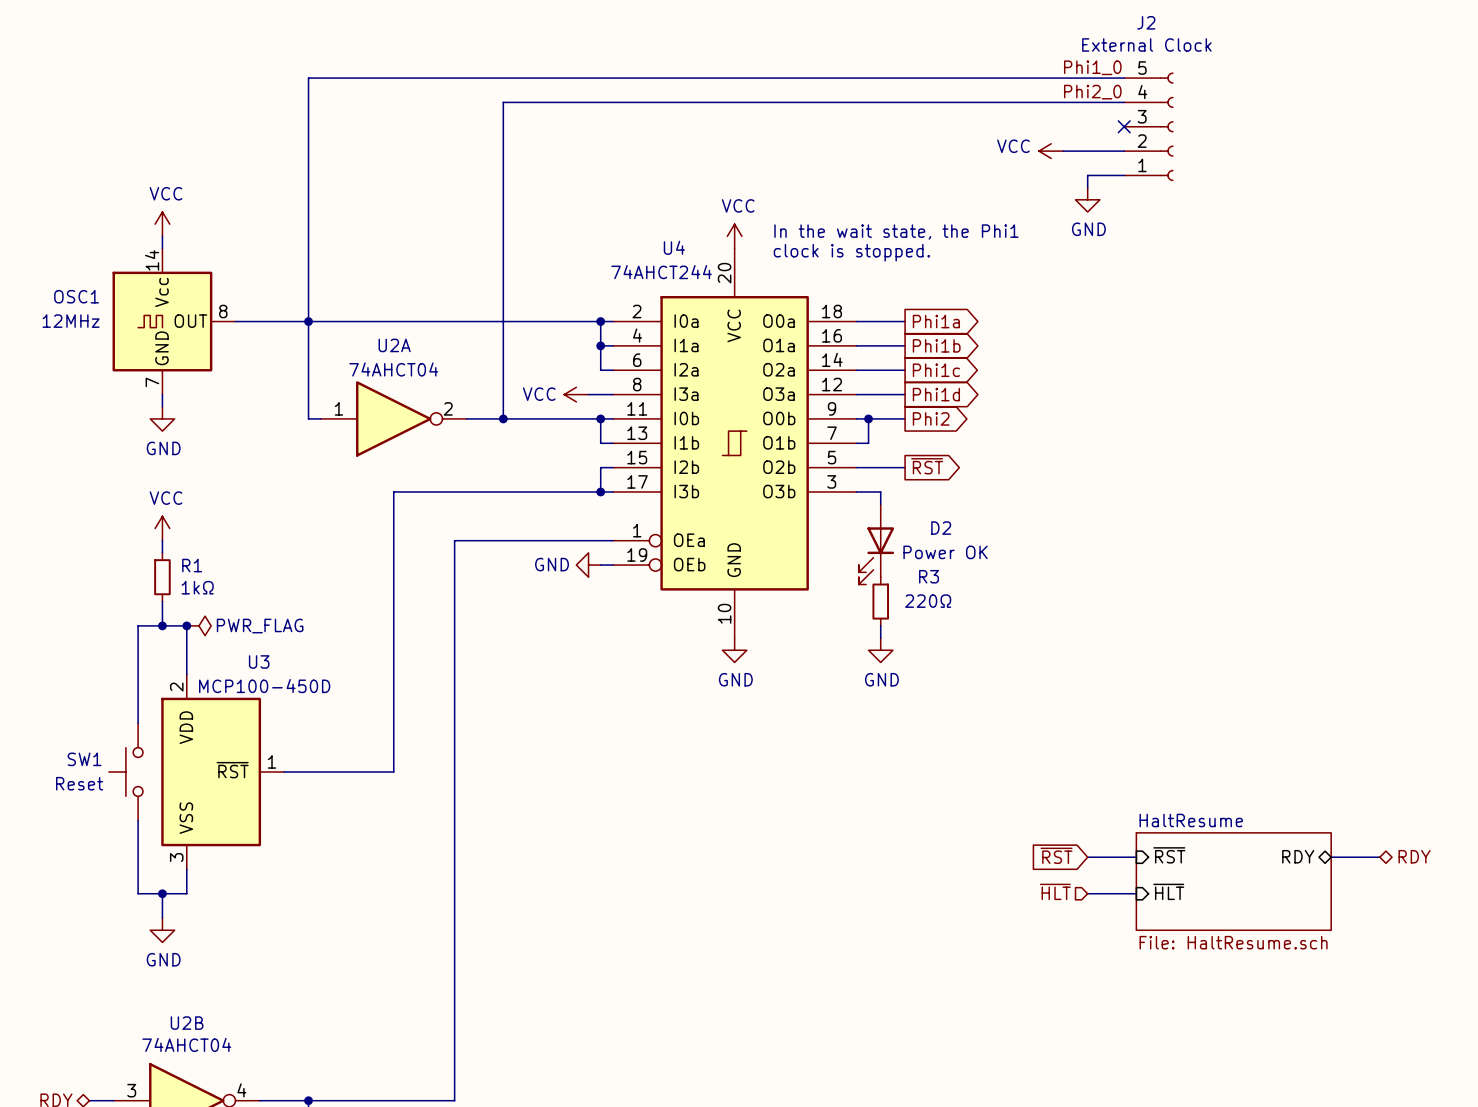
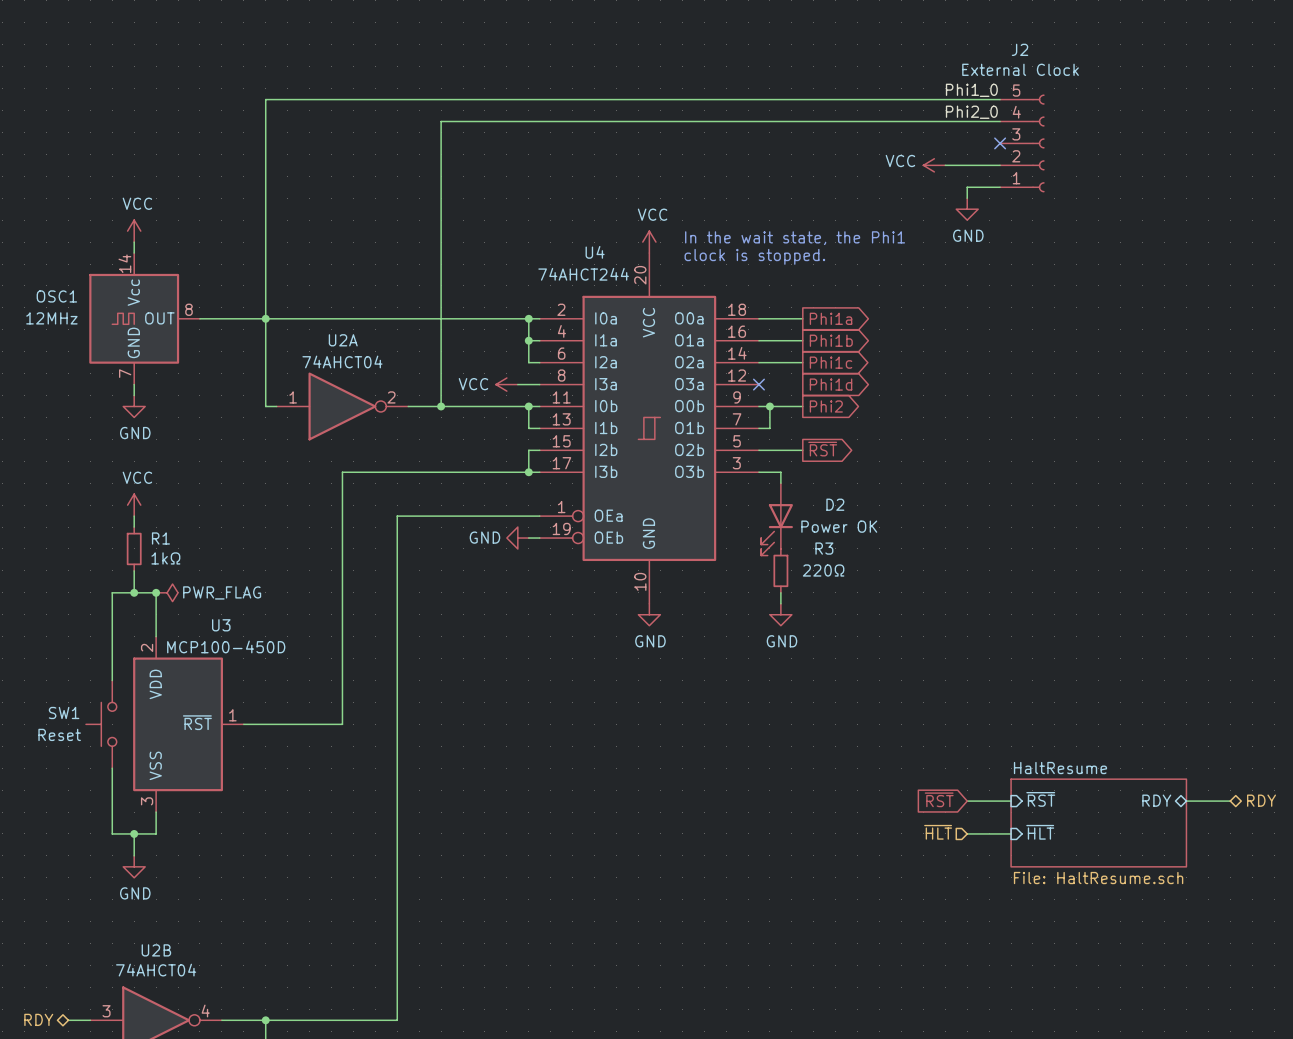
wire: (856, 394) (905, 394) -> none
no-connect mark: none -> (758, 384)

